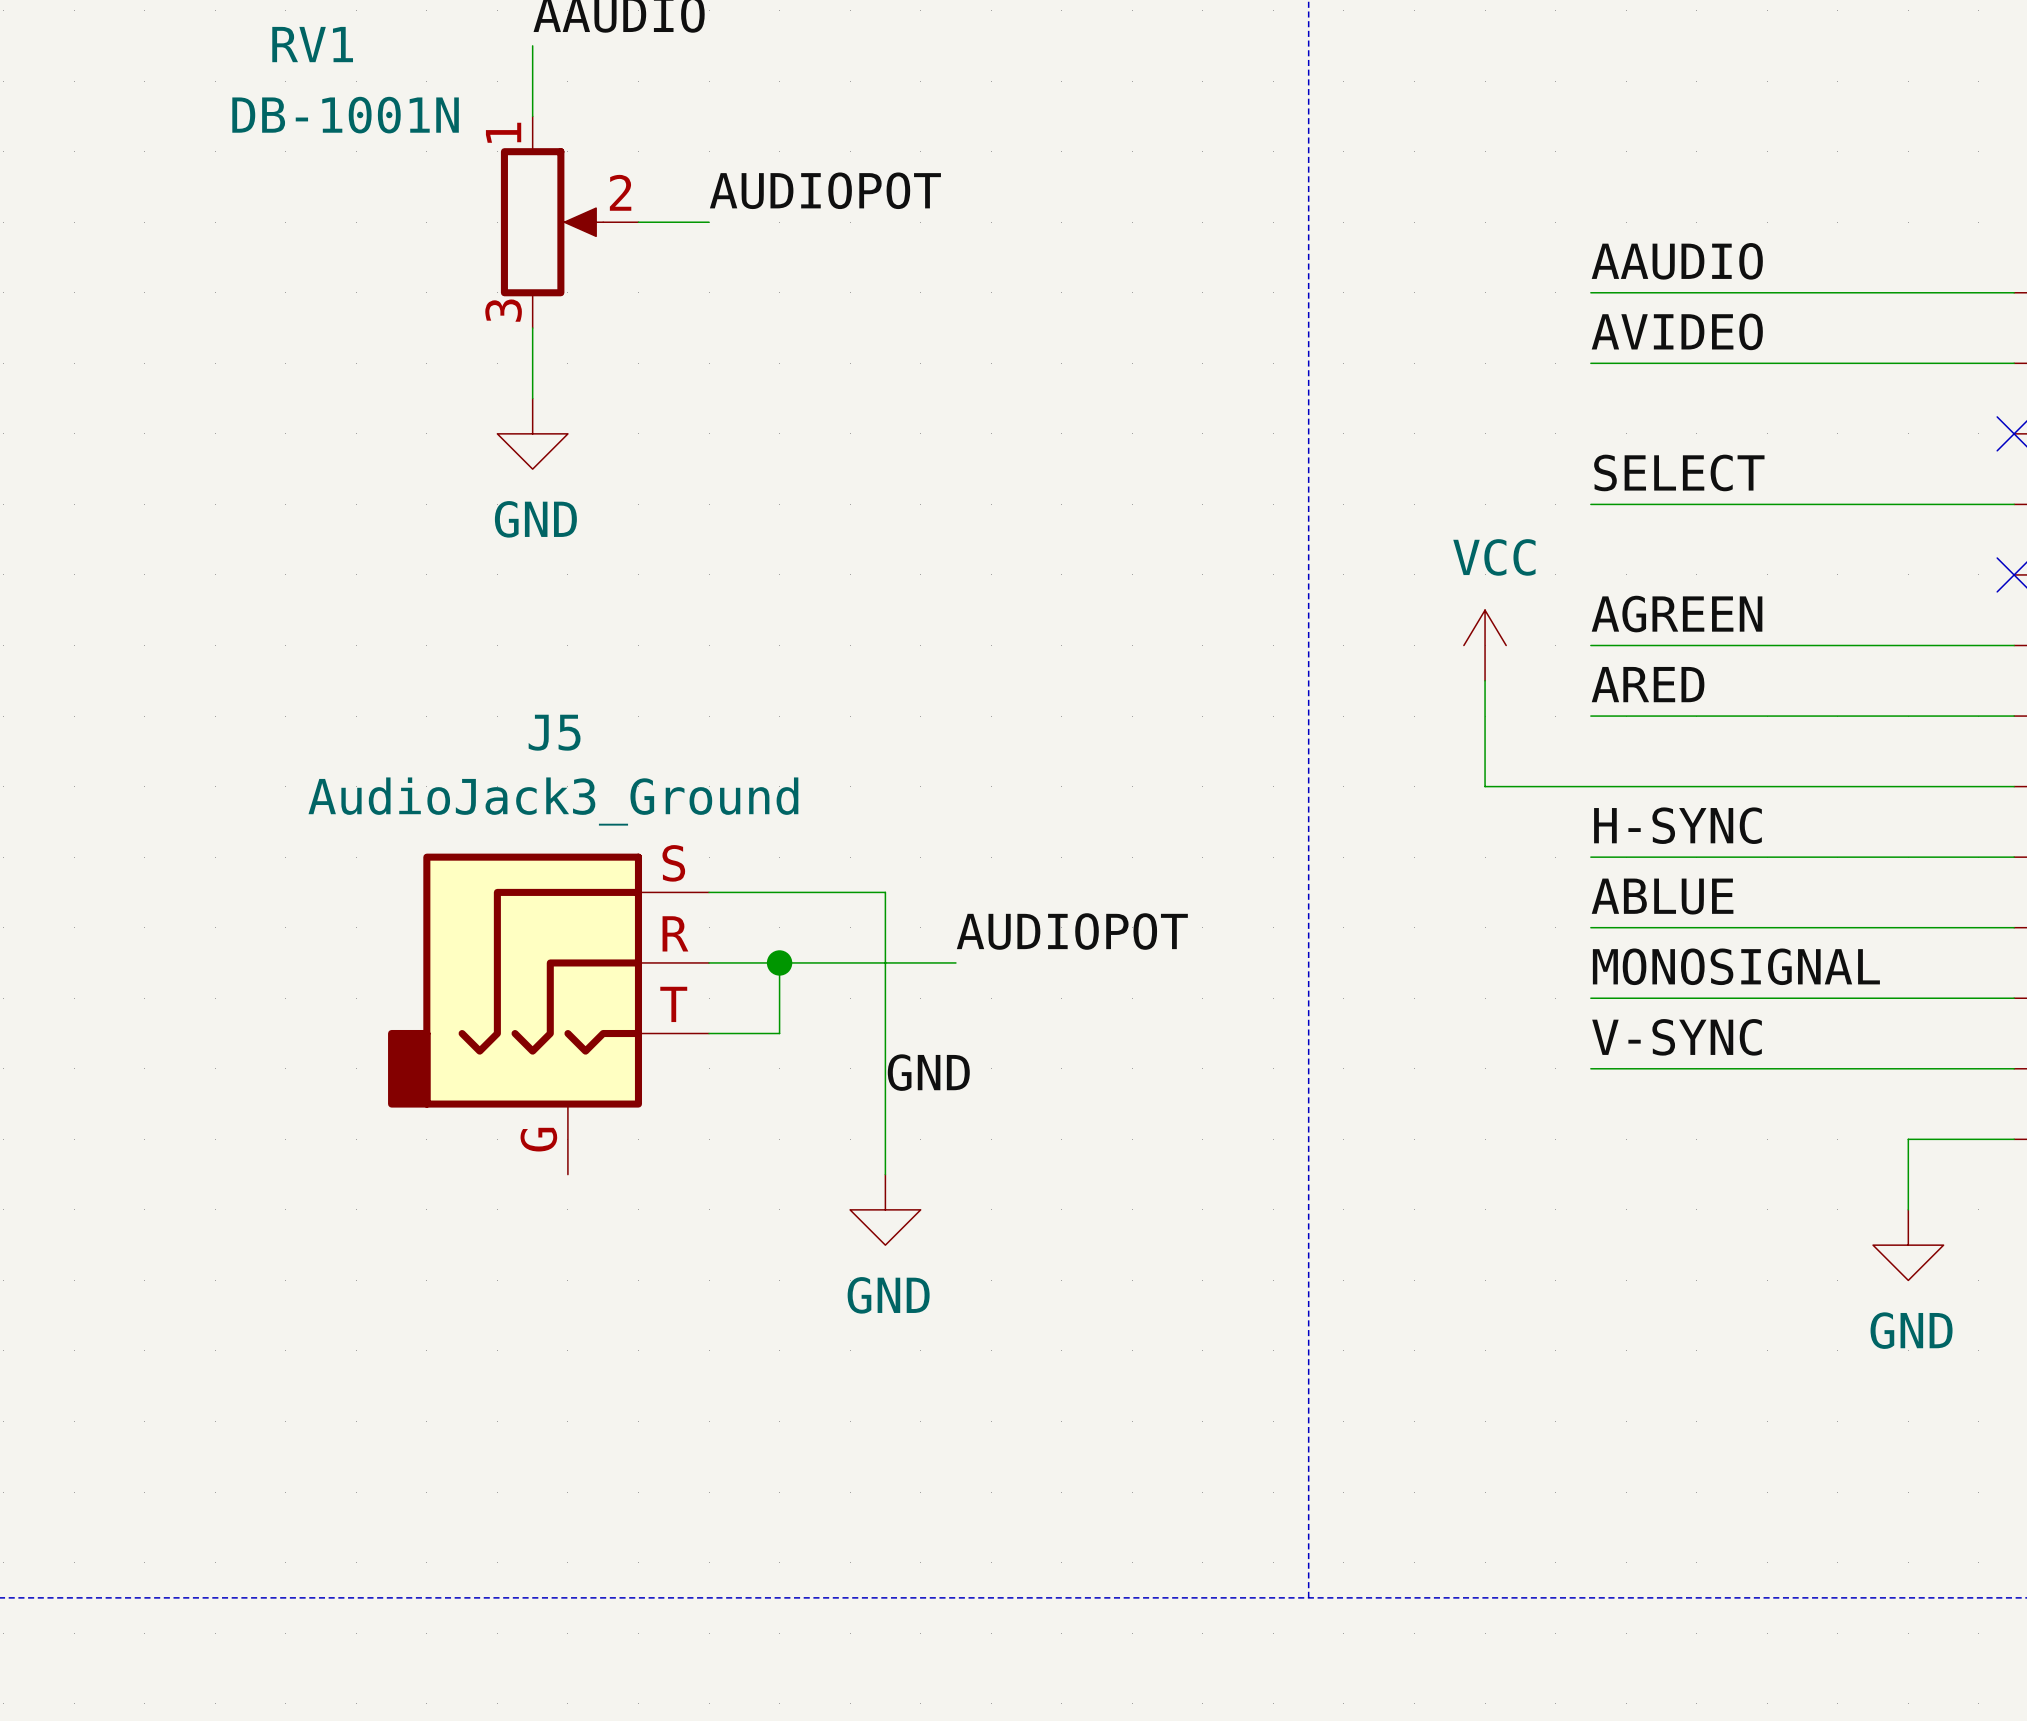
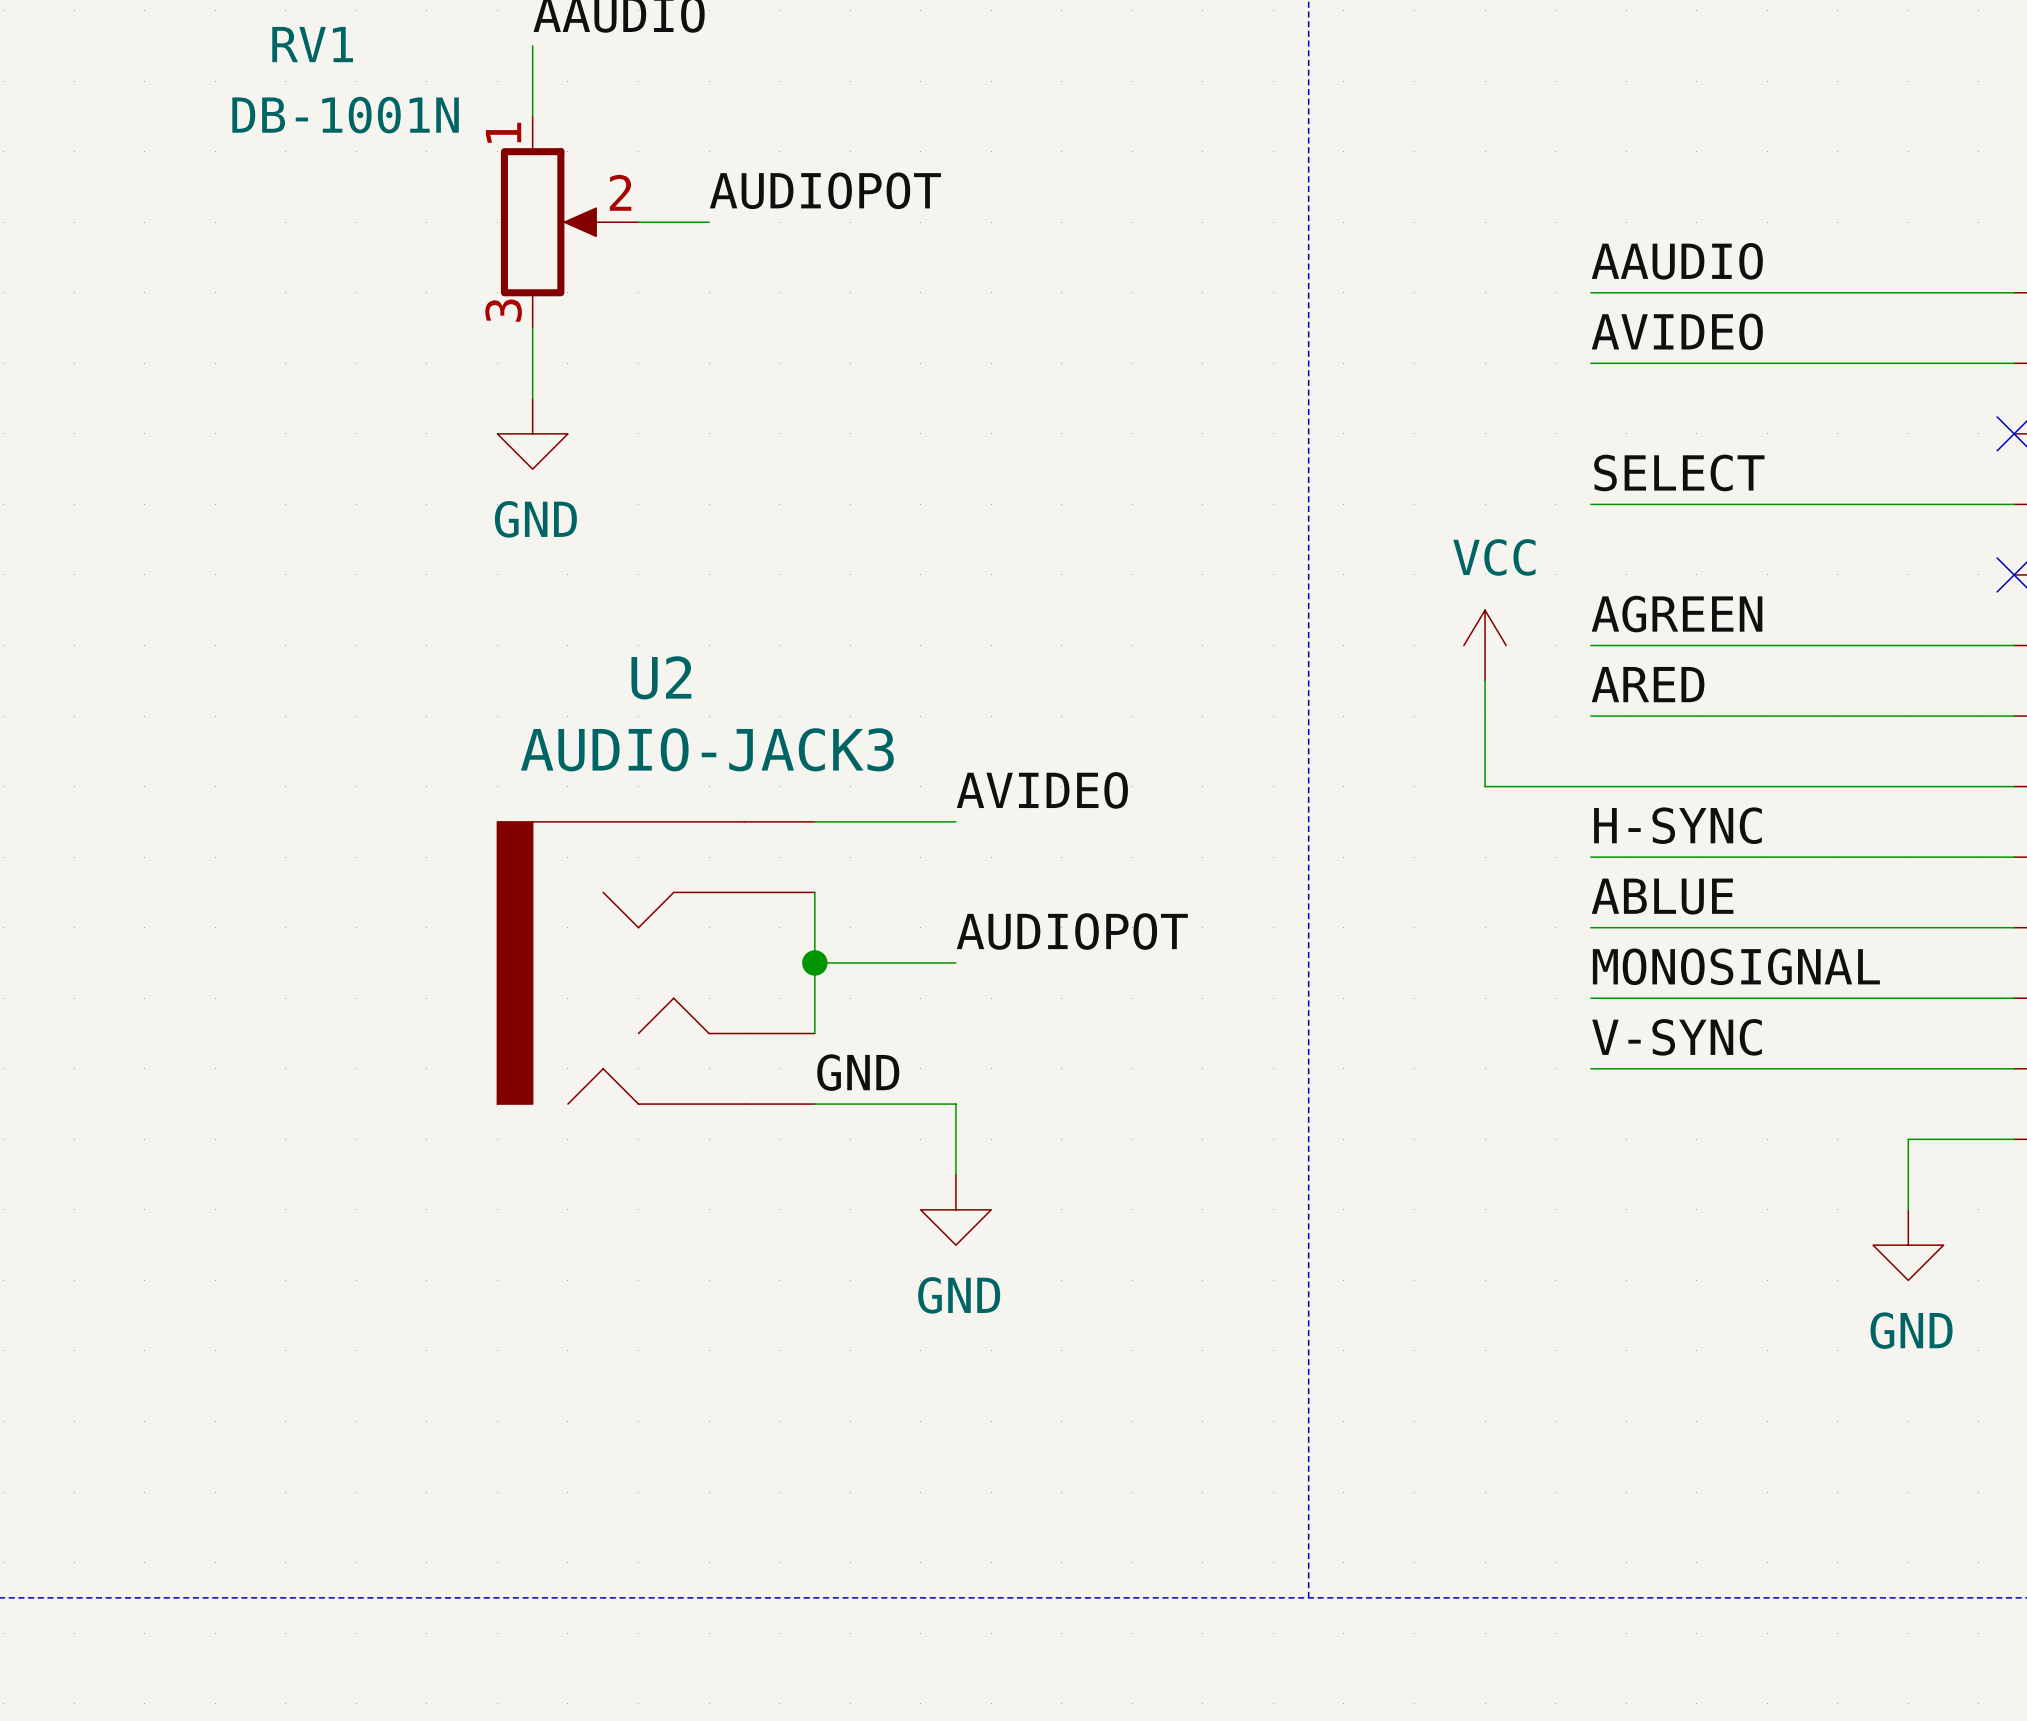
label: none -> AVIDEO (1042, 790)
wire: none -> (814, 821) (955, 821)
wire: (709, 892) (885, 892) (885, 1174) -> none
wire: none -> (814, 892) (814, 1033)
U2: none -> AUDIO-JACK3 (656, 962)
wire: (709, 962) (814, 962) -> none
wire: (779, 962) (779, 1033) (709, 1033) -> none
junction position: (779, 962) -> (814, 962)
J5: AudioJack3_Ground (548, 1014) -> none
label position: GND (928, 1072) -> GND (858, 1072)
wire: none -> (814, 1104) (955, 1104) (955, 1174)
power symbol position: GND (885, 1209) -> GND (955, 1209)

